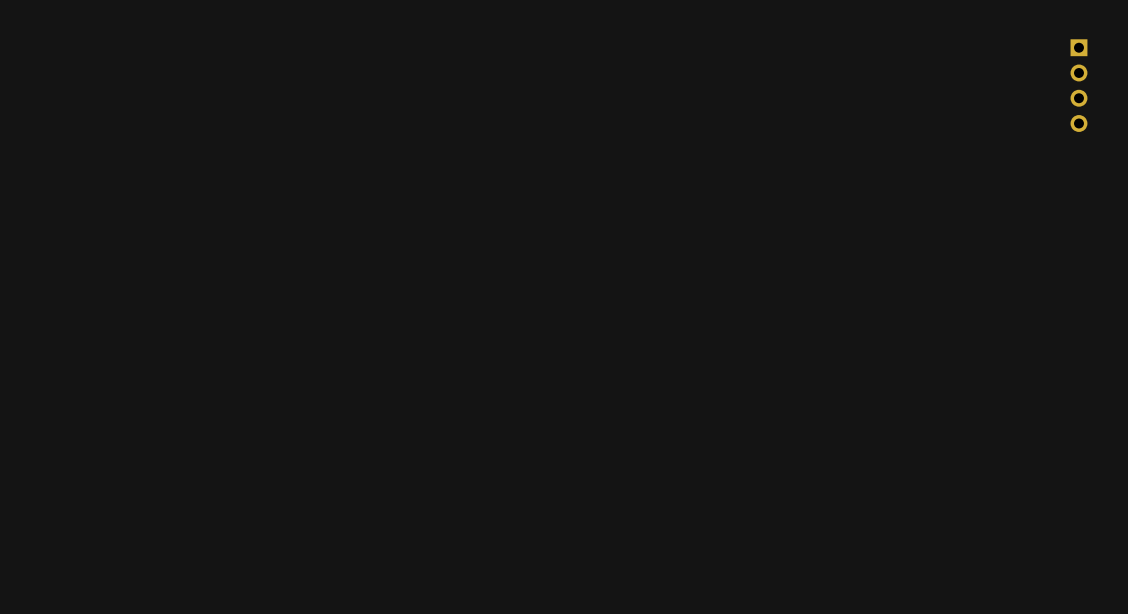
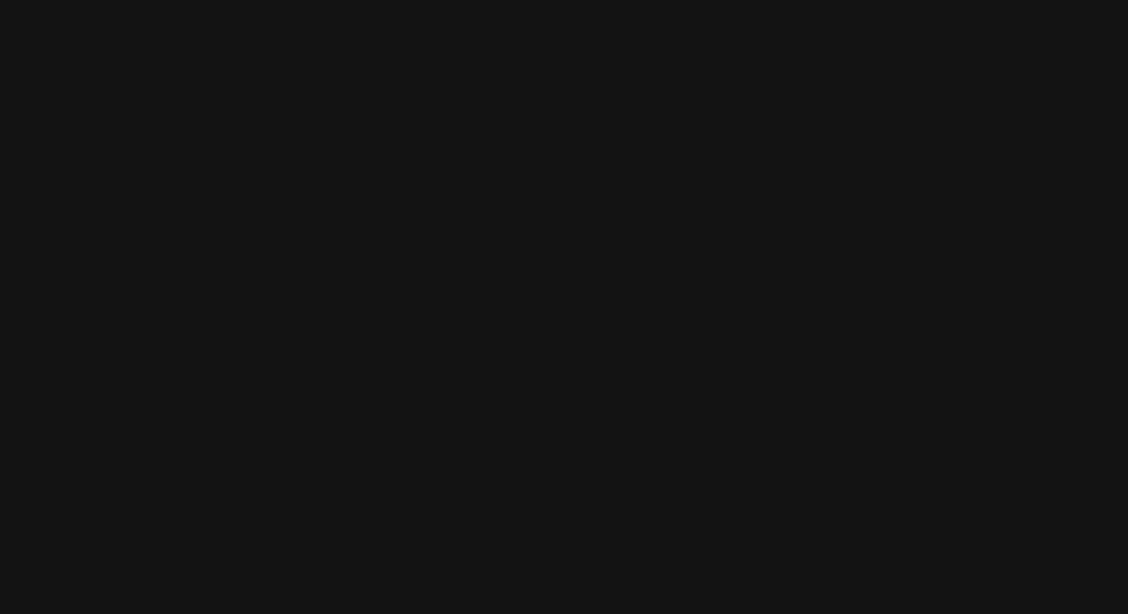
part: (1078, 85) -> none

